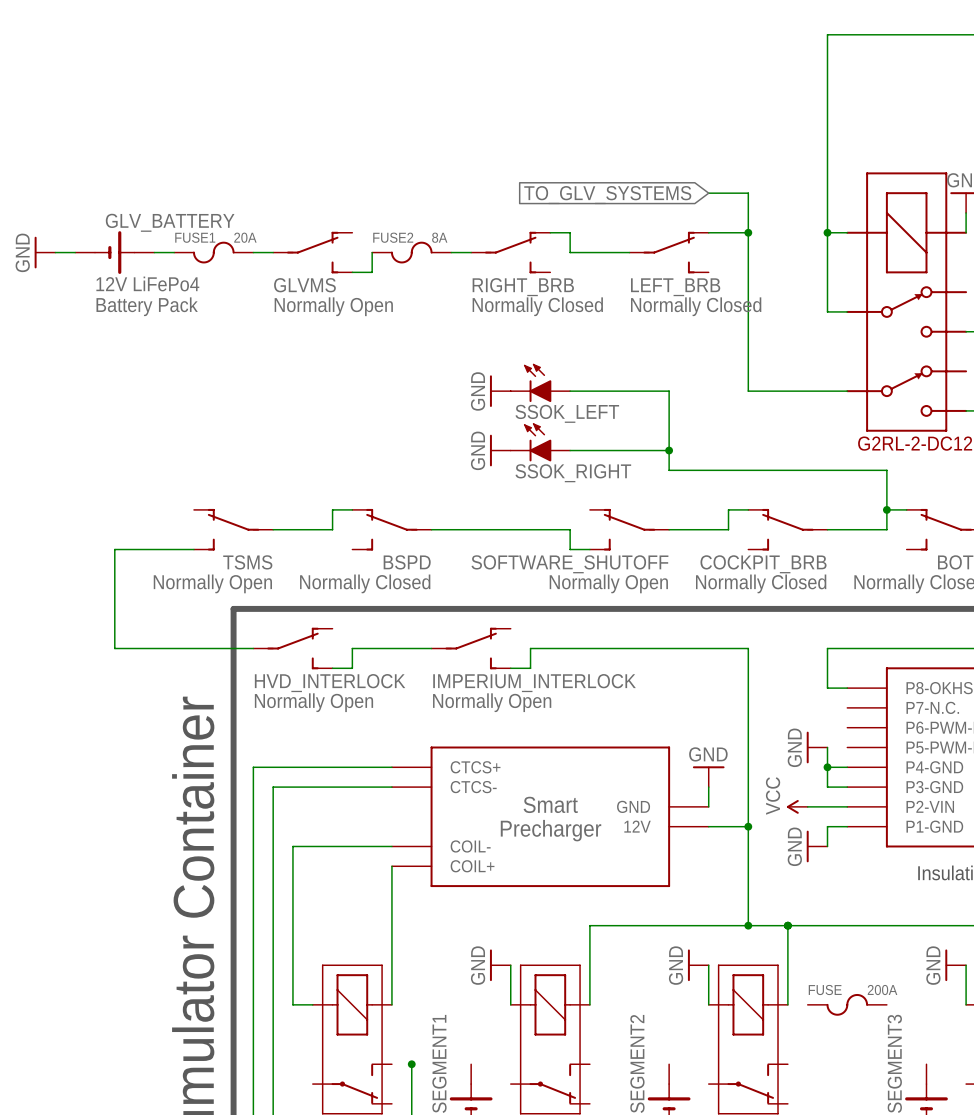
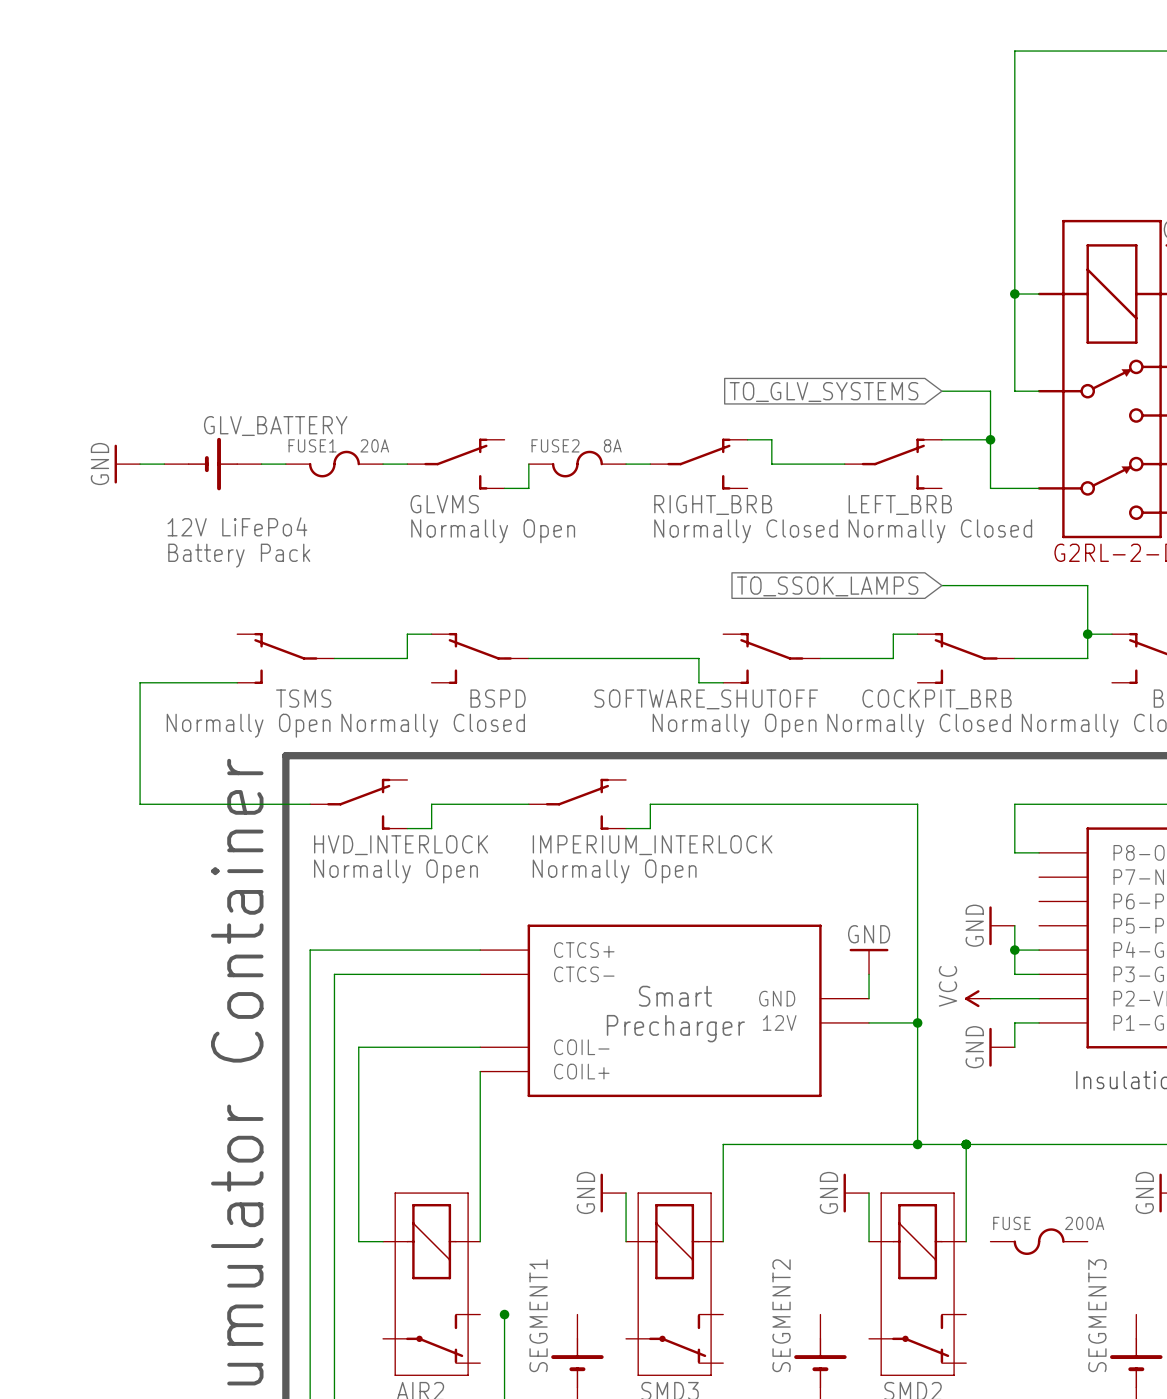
wire: (708, 193) (748, 193) (748, 391) (807, 391) -> (941, 391) (990, 391) (990, 488)
global label position: TO_GLV_SYSTEMS (607, 195) -> TO_GLV_SYSTEMS (824, 392)
wire: (550, 232) (570, 232) (570, 252) (629, 252) -> (747, 439) (771, 439) (771, 464) (844, 464)
wire: (708, 232) (748, 232) -> (941, 439) (990, 439)
junction: (748, 232) -> none
power symbol position: GND (45, 252) -> GND (127, 464)
wire: (55, 252) (75, 252) -> (140, 464) (164, 464)
GLV_BATTERY position: (114, 252) -> (212, 464)
wire: (154, 252) (174, 252) -> (261, 464) (285, 464)
FUSE1 position: (213, 252) -> (334, 464)
wire: (253, 252) (273, 252) -> (383, 464) (407, 464)
GLVMS position: (312, 252) -> (455, 464)
wire: (372, 252) (372, 272) (352, 272) -> (528, 464) (528, 488) (504, 488)
FUSE2 position: (411, 252) -> (577, 464)
wire: (451, 252) (471, 252) -> (626, 464) (650, 464)
RIGHT_BRB position: (510, 252) -> (698, 464)
LEFT_BRB position: (669, 252) -> (893, 464)
text position: 12V LiFePo4 (147, 283) -> 12V LiFePo4 (237, 526)
text position: Battery Pack (147, 306) -> Battery Pack (239, 555)
junction: none -> (990, 439)
SSOK_LEFT: (540, 382) -> none
power symbol: GND (500, 391) -> none
wire: (570, 391) (669, 391) (669, 470) (768, 470) -> none
SSOK_RIGHT: (540, 442) -> none
power symbol: GND (500, 450) -> none
wire: (570, 450) (669, 450) -> none
junction: (669, 450) -> none
global label: none -> TO_SSOK_LAMPS (827, 586)

